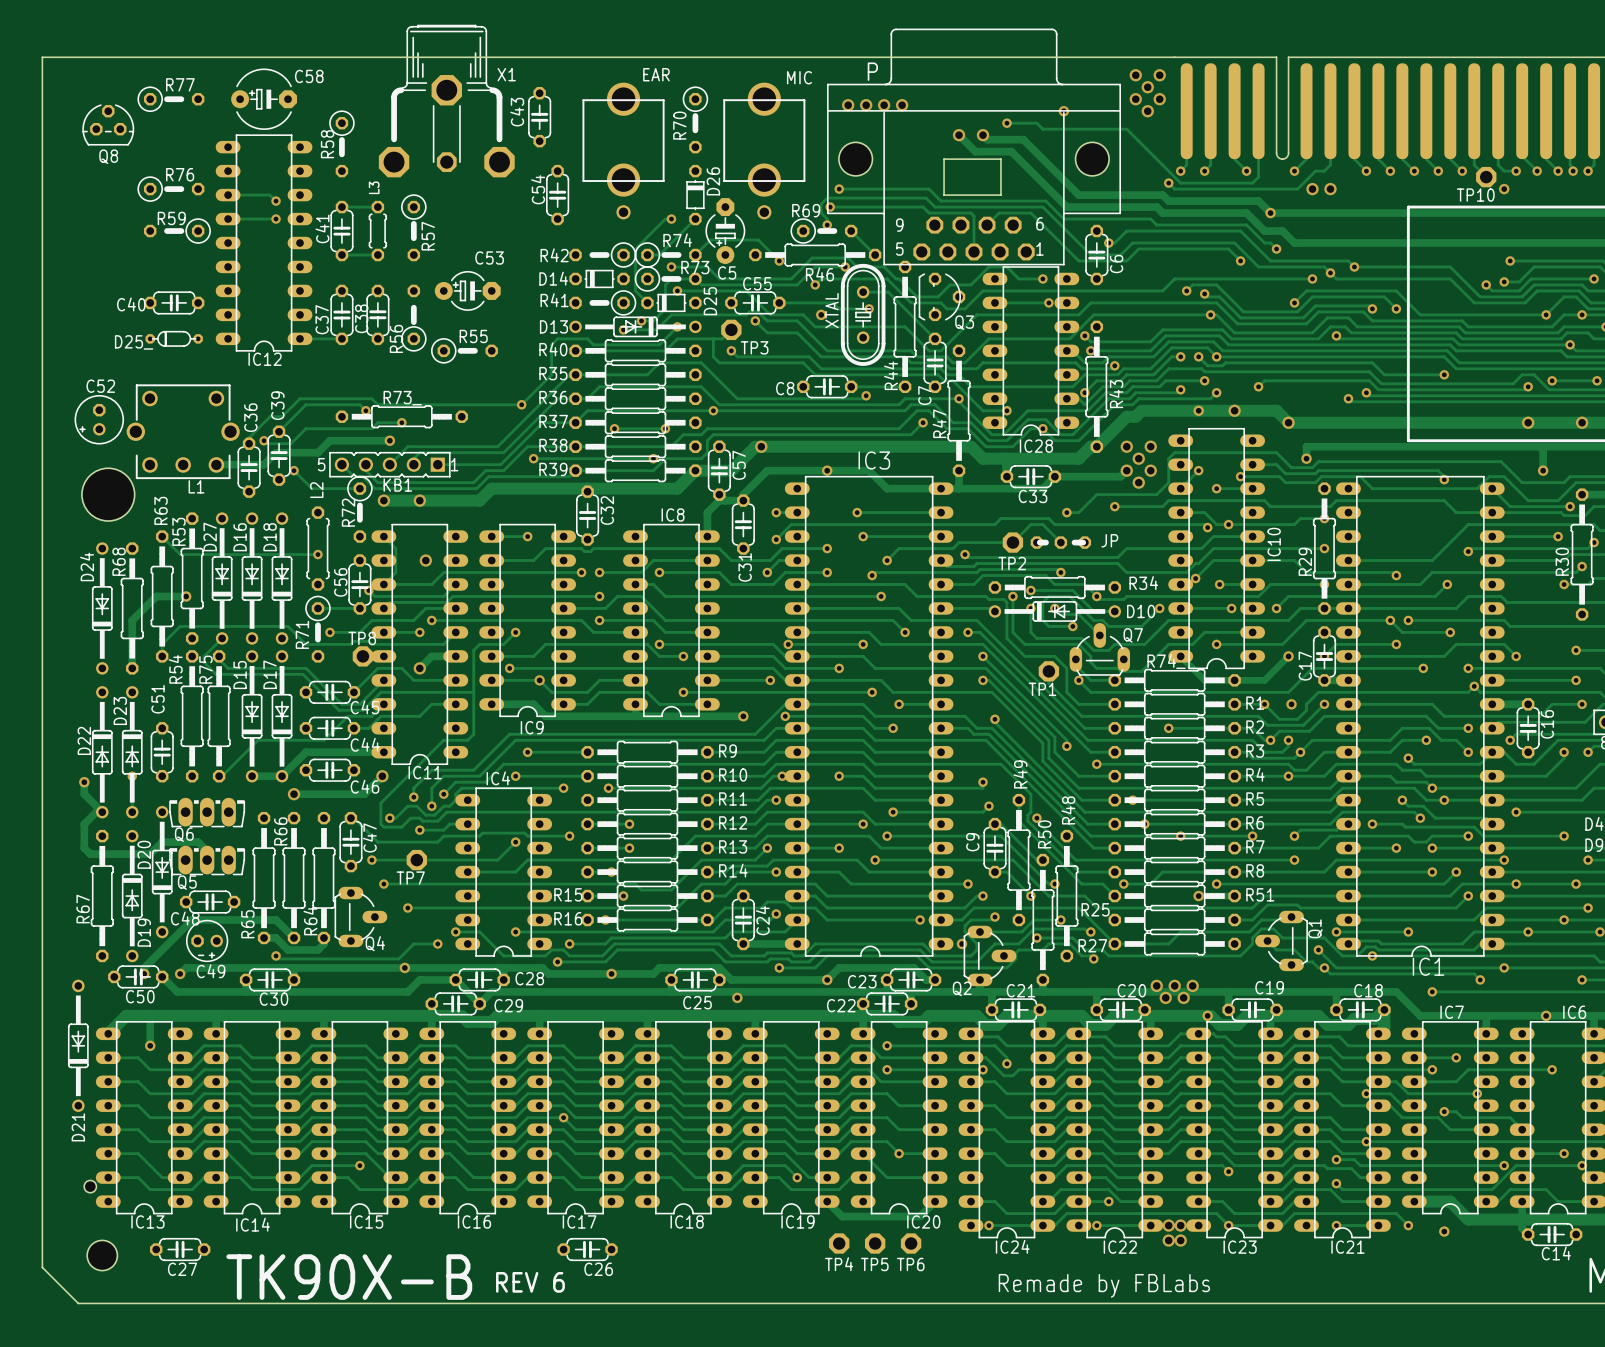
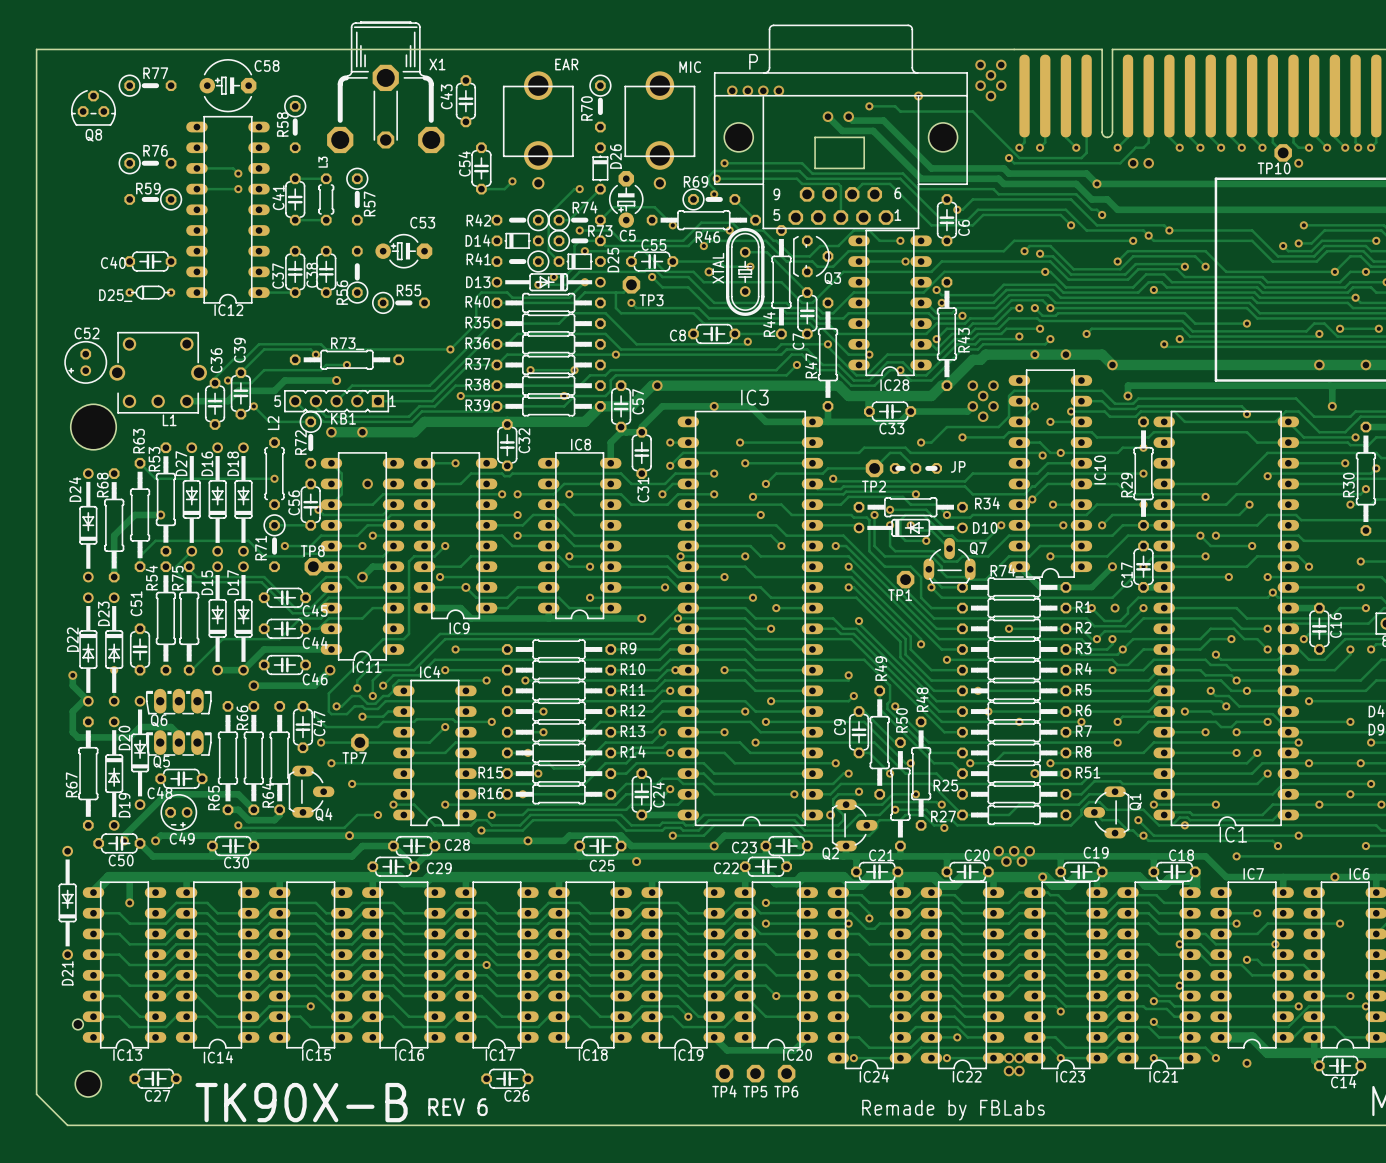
track: none -> (512, 181) (504, 189) (481, 189)
via: none -> (512, 181)

